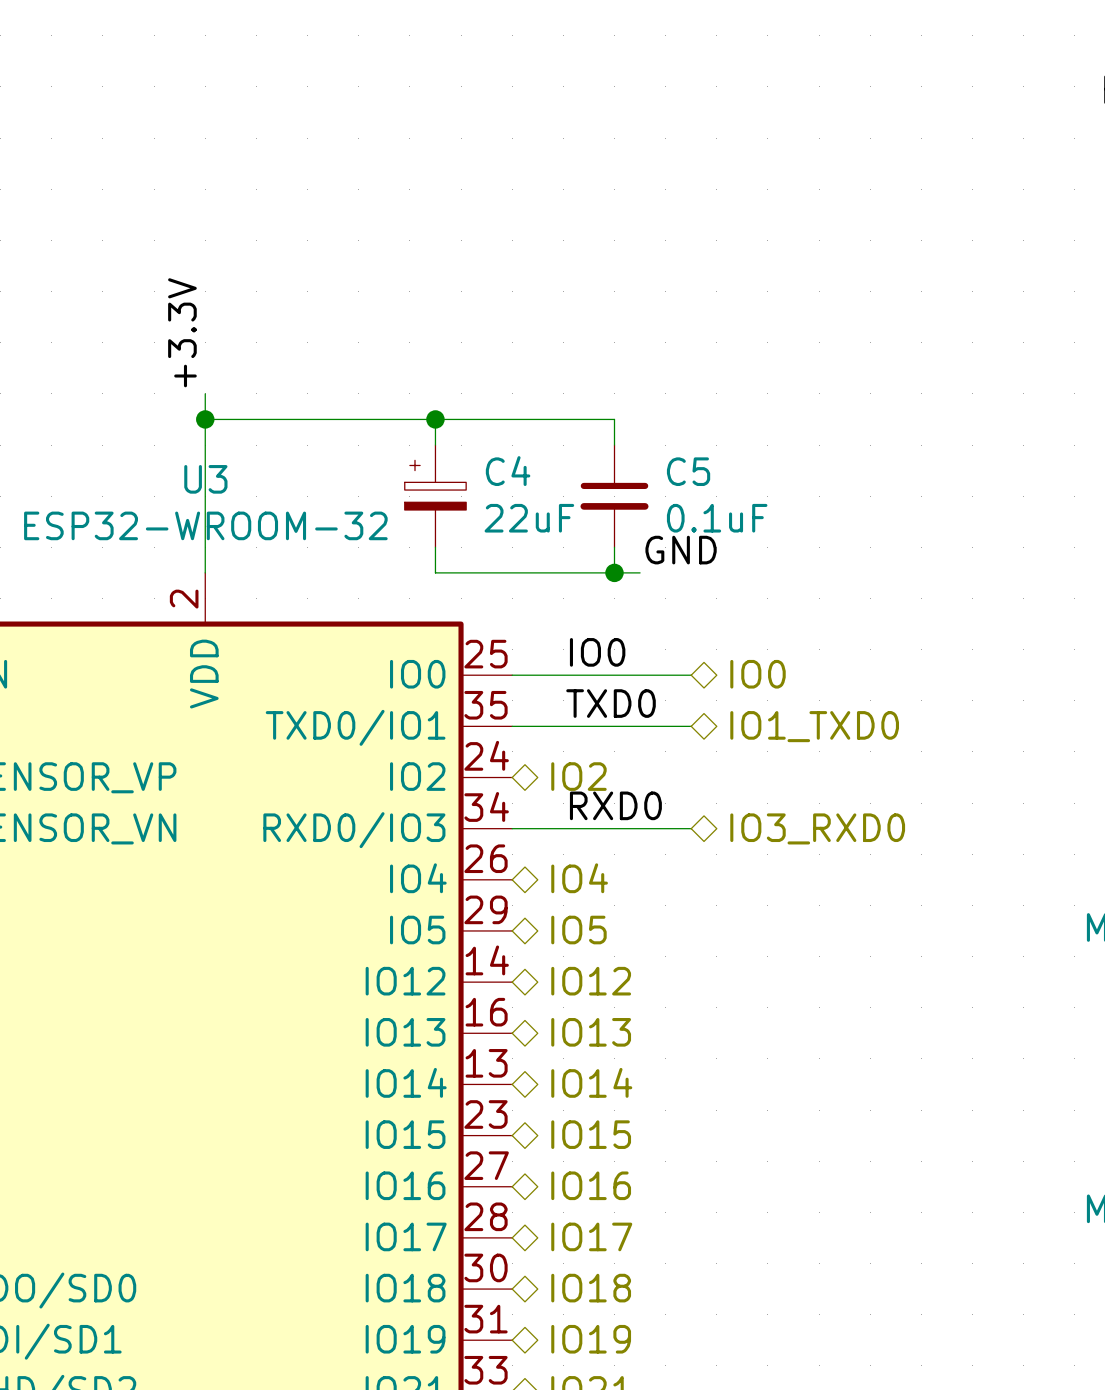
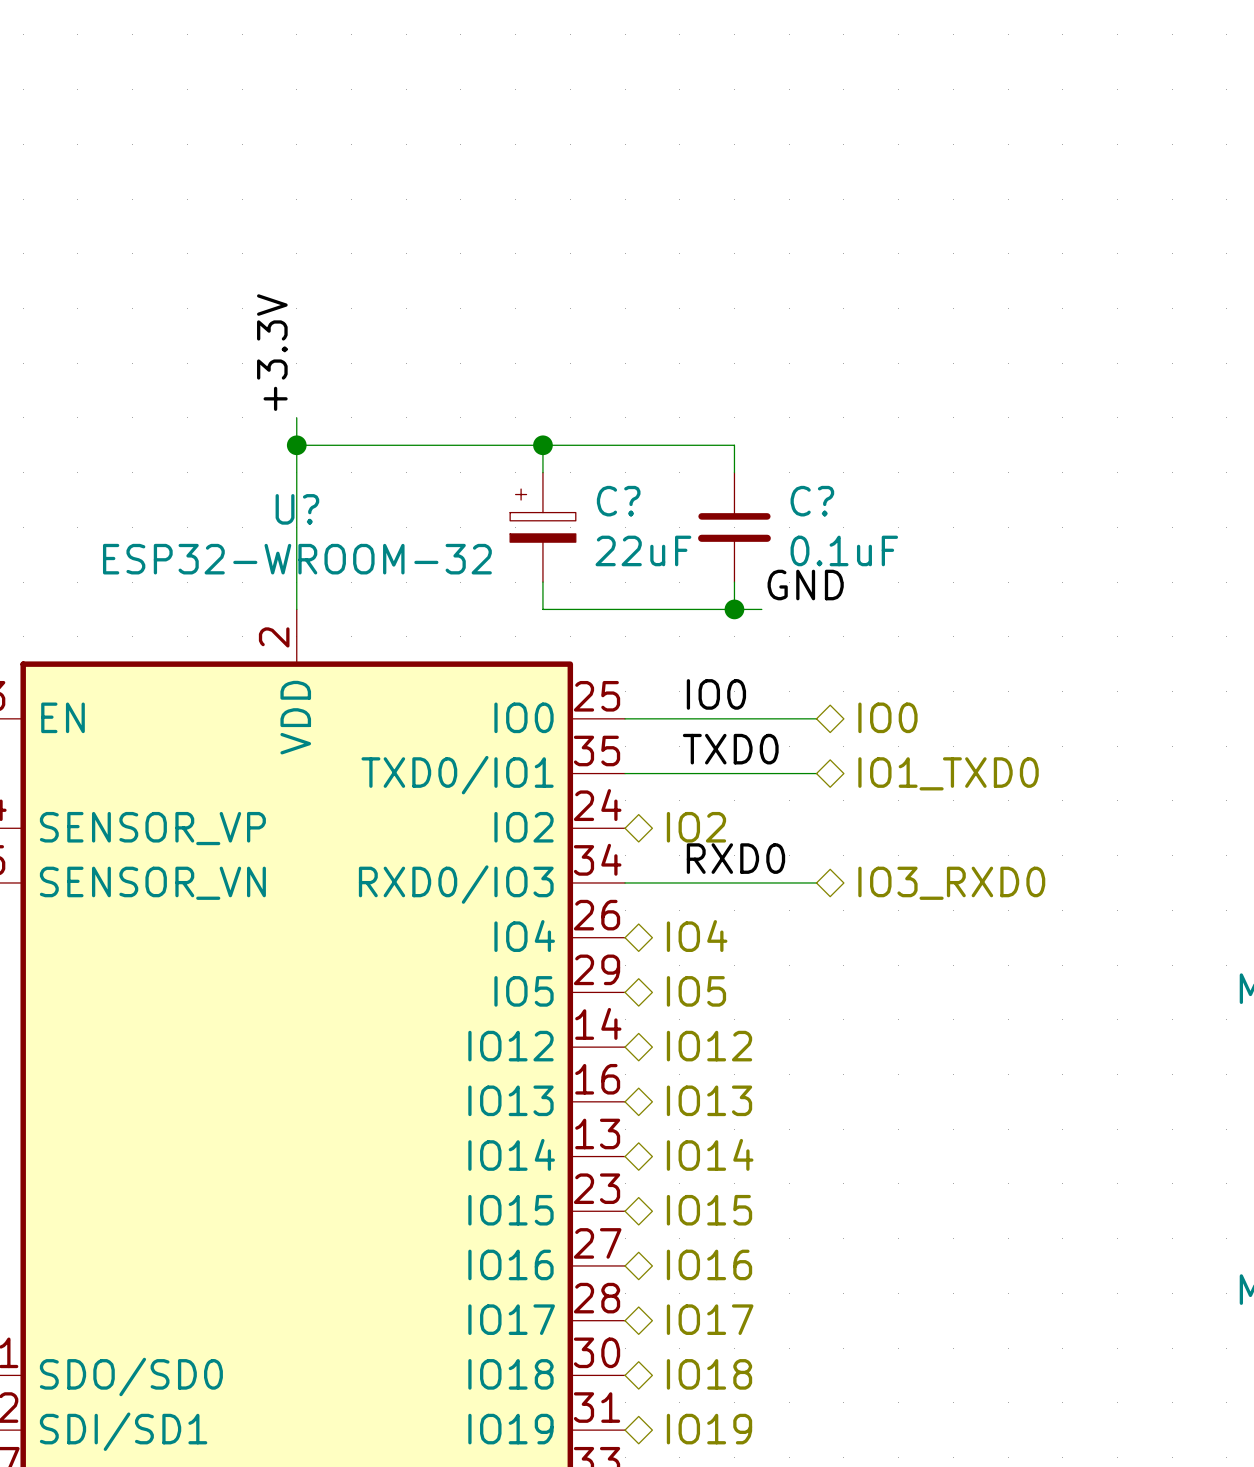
C4 name: C4 (508, 471) -> C? (618, 501)
C5 name: C5 (688, 471) -> C? (812, 501)
U3 name: U3 (205, 479) -> U? (297, 509)

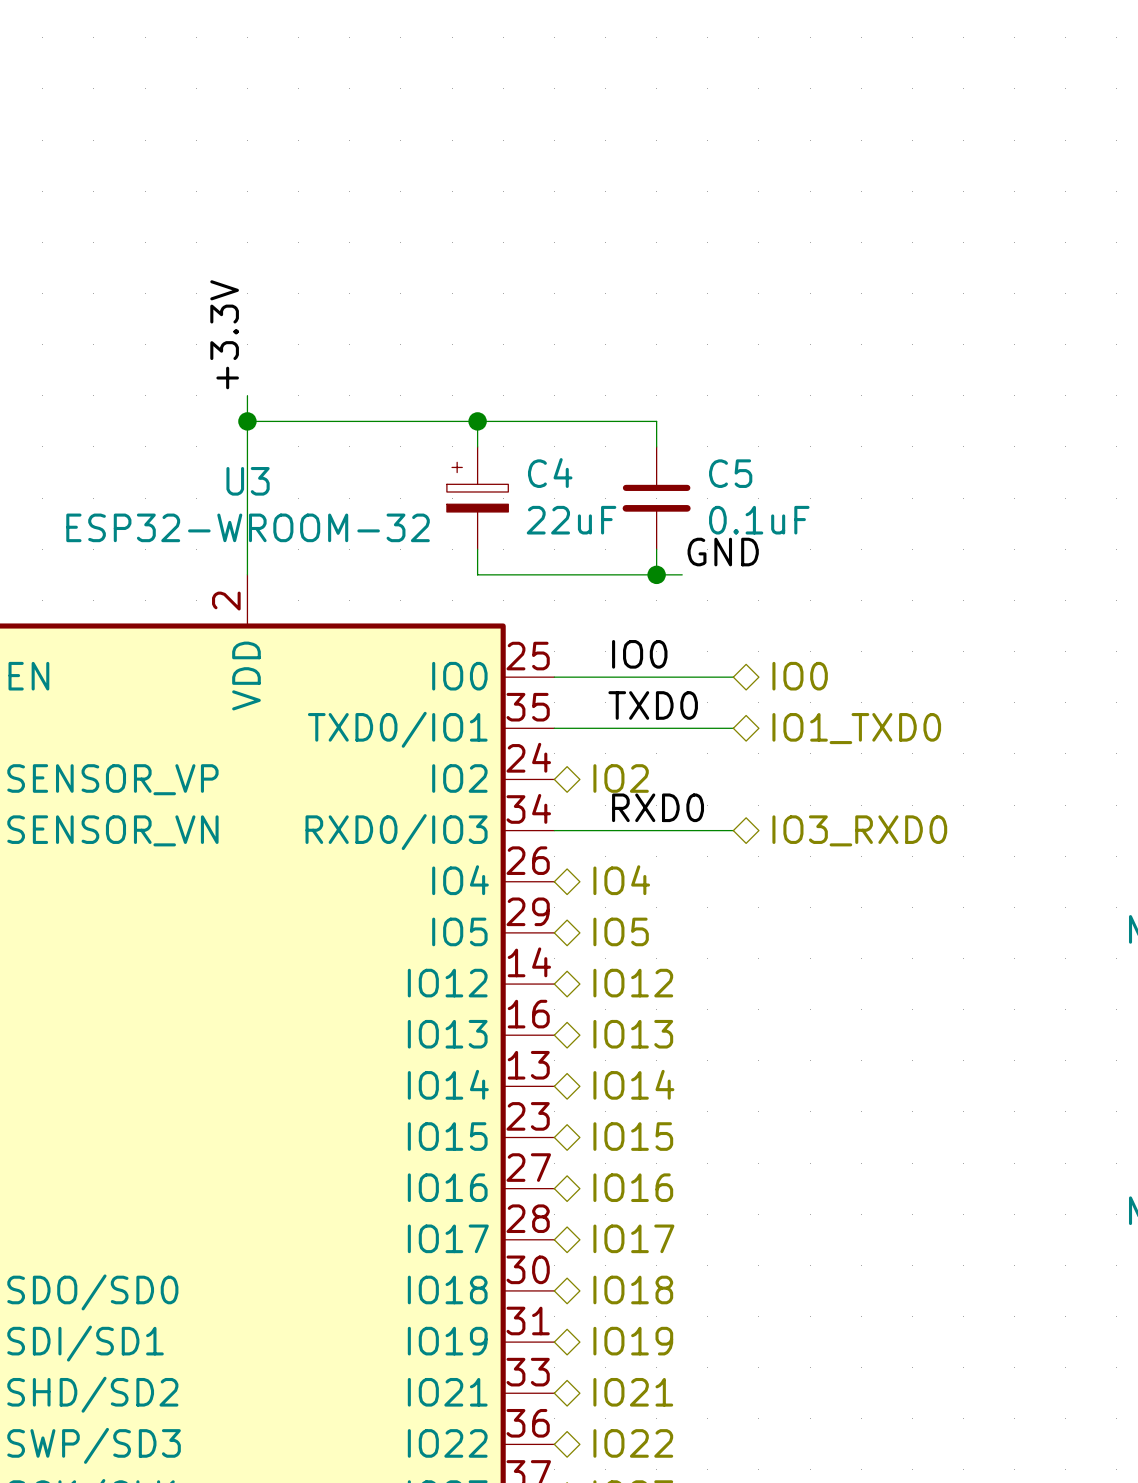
C? name: C? (618, 501) -> C4 (550, 473)
C? name: C? (812, 501) -> C5 (730, 473)
U? name: U? (297, 509) -> U3 (248, 481)

